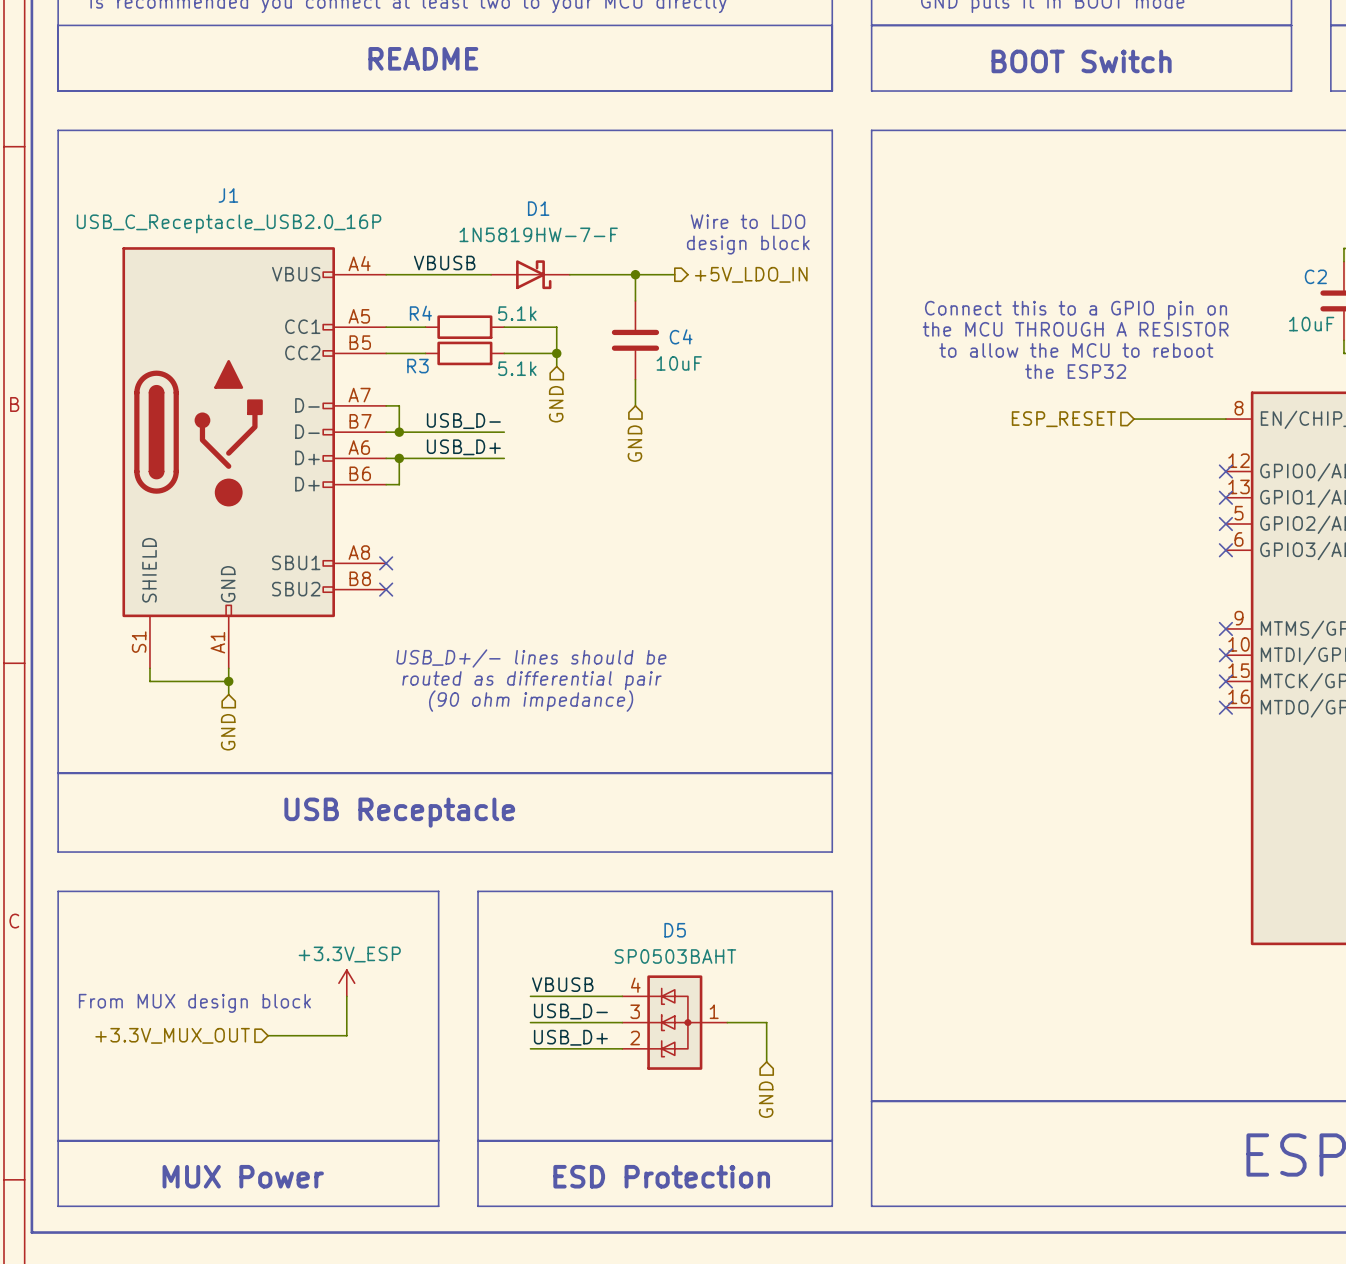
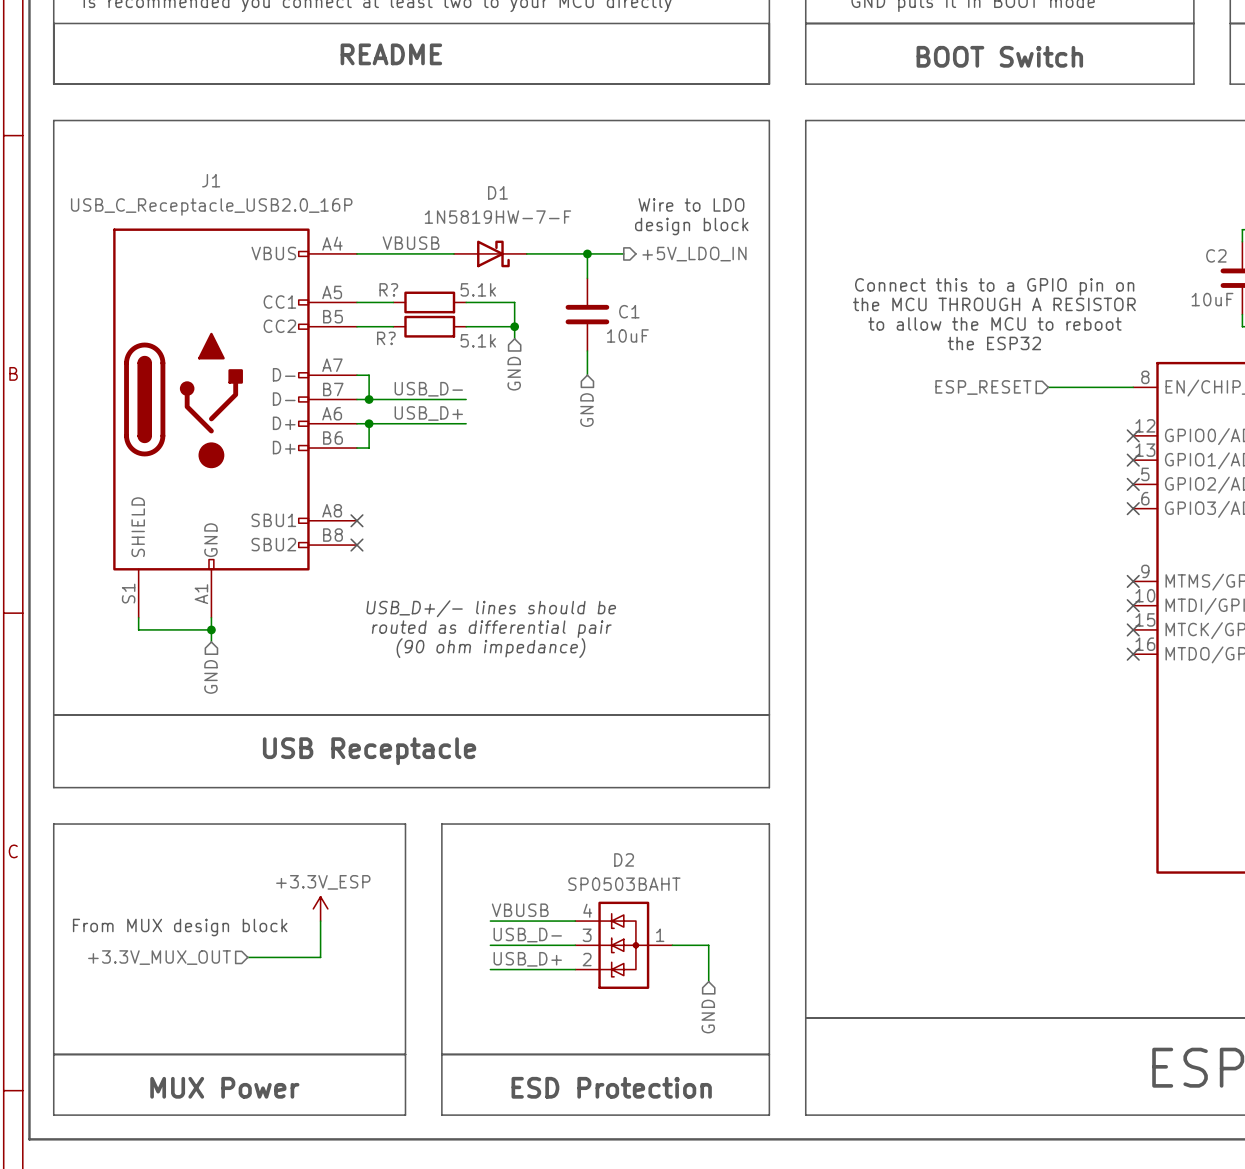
R4 name: R4 (420, 313) -> R? (388, 289)
C4 name: C4 (681, 336) -> C1 (629, 311)
R3 name: R3 (417, 366) -> R? (386, 338)
D5 name: D5 (675, 930) -> D2 (624, 859)

